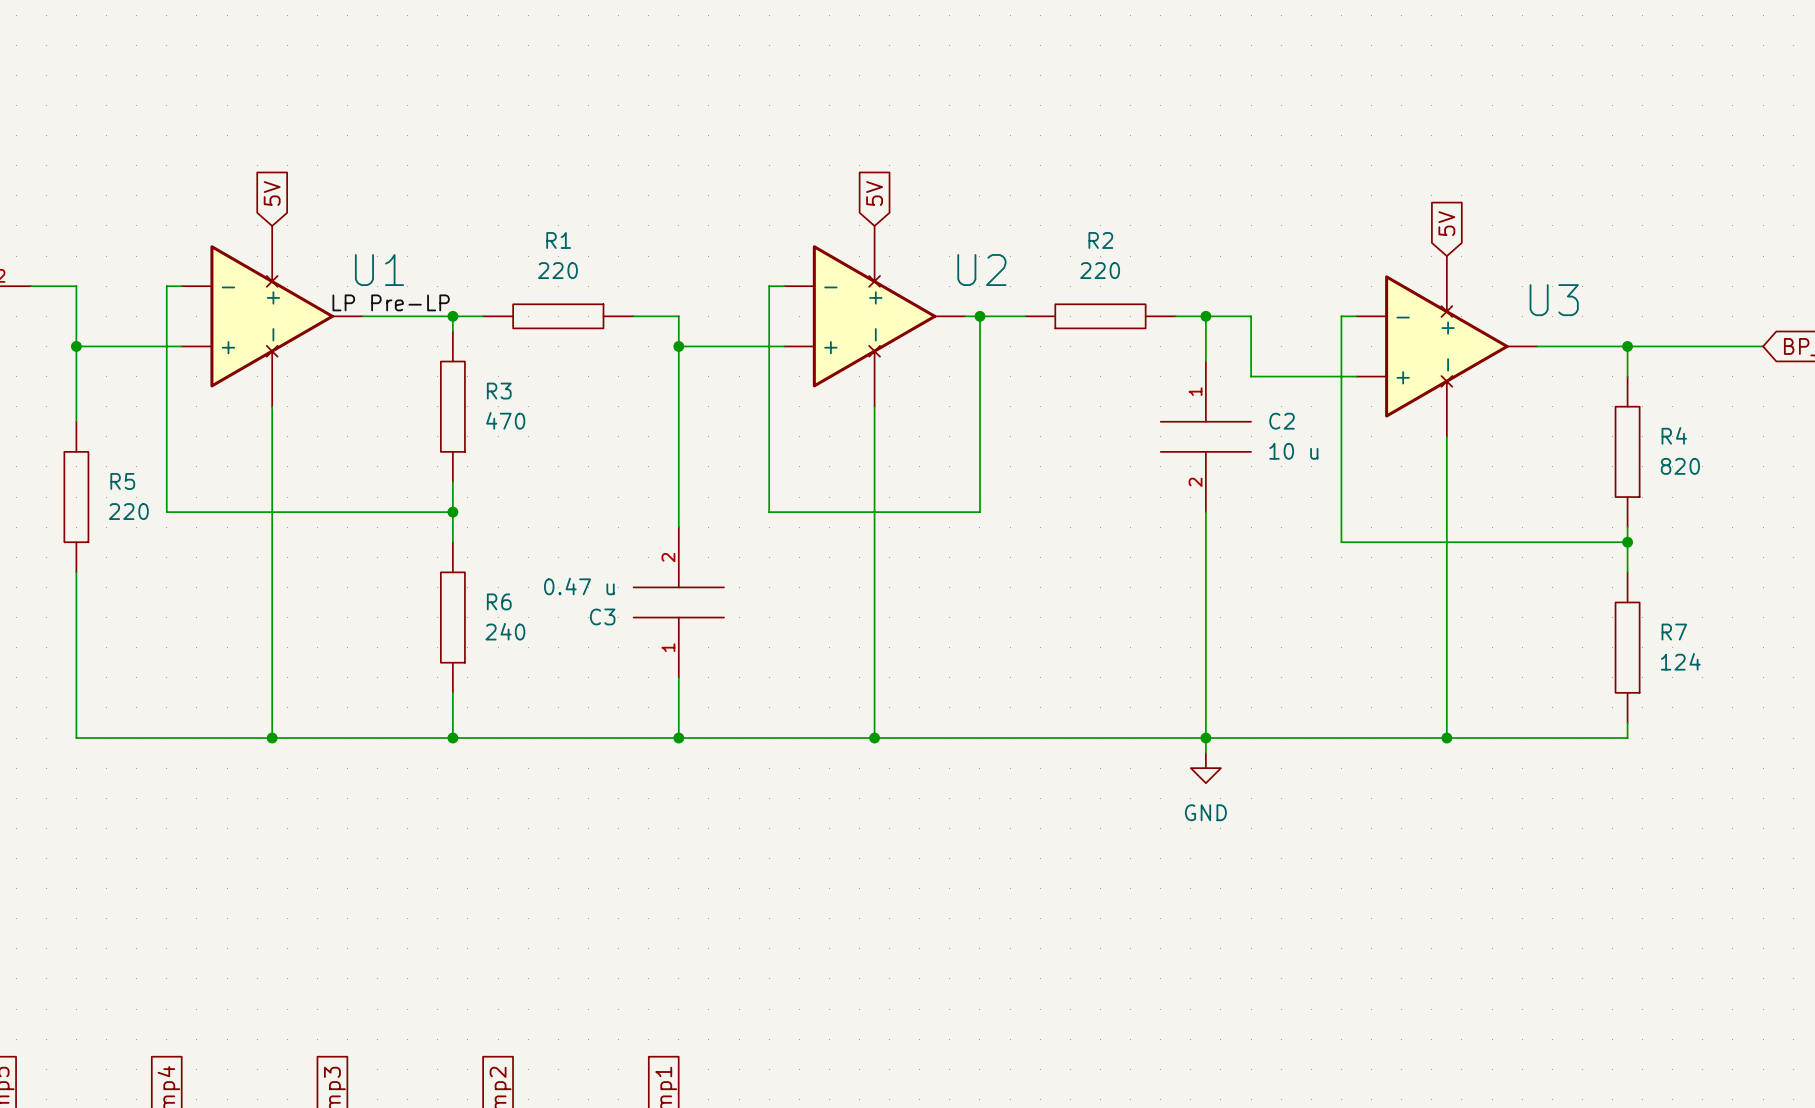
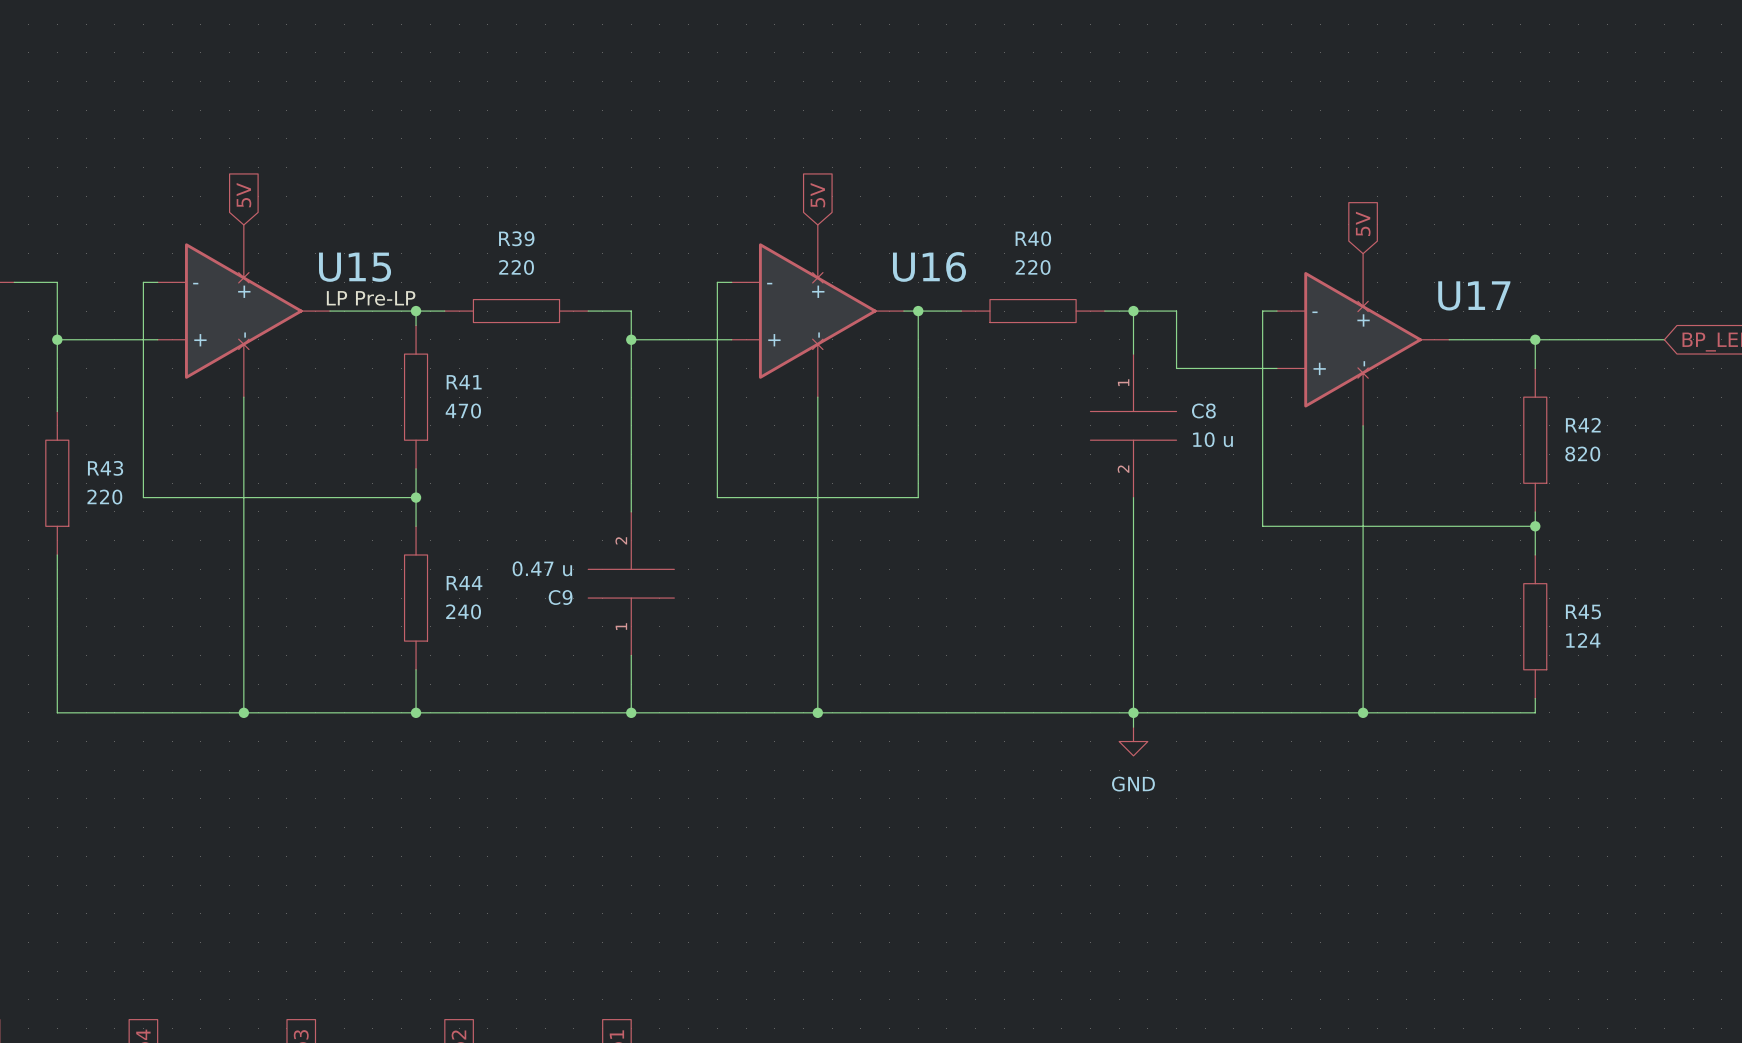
R1 name: R1 (558, 240) -> R39 (516, 238)
R2 name: R2 (1100, 240) -> R40 (1033, 238)
U1 name: U1 (379, 270) -> U15 (355, 267)
U2 name: U2 (981, 270) -> U16 (929, 266)
U3 name: U3 (1554, 300) -> U17 (1474, 295)
R3 name: R3 (499, 391) -> R41 (464, 382)
C2 name: C2 (1282, 421) -> C8 (1203, 410)
R4 name: R4 (1674, 435) -> R42 (1583, 425)
R5 name: R5 (122, 481) -> R43 (105, 468)
R6 name: R6 (499, 601) -> R44 (464, 583)
C3 name: C3 (602, 616) -> C9 (560, 597)
R7 name: R7 (1674, 632) -> R45 (1583, 611)

